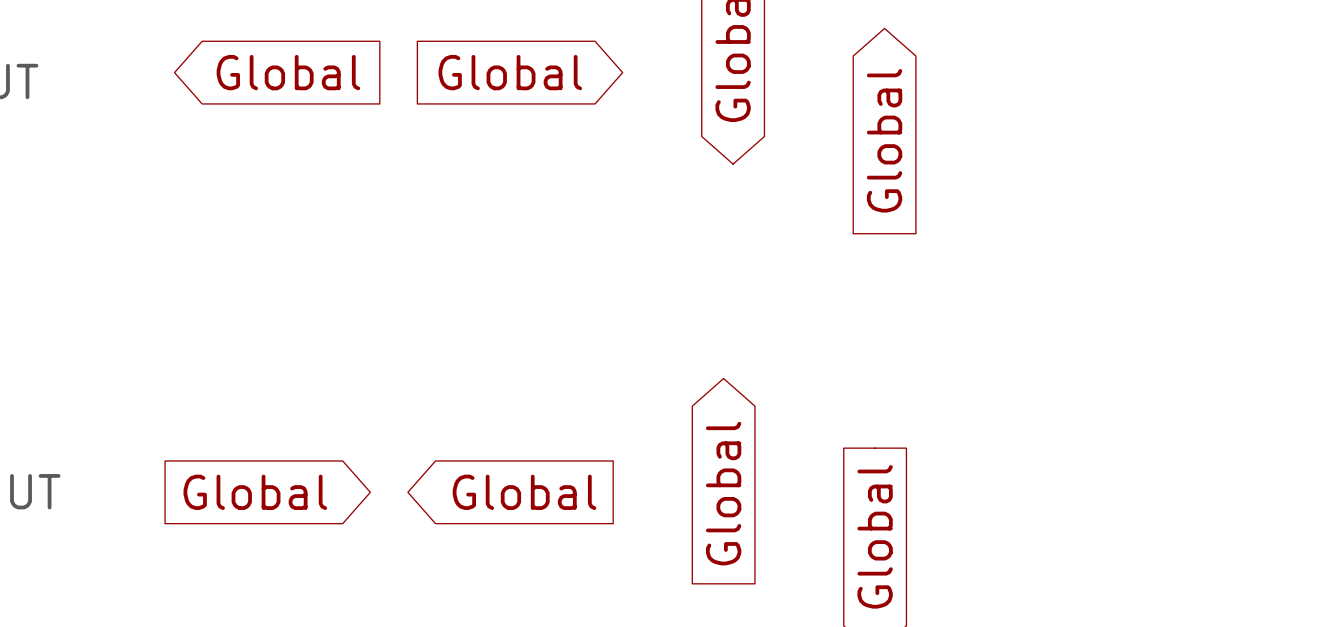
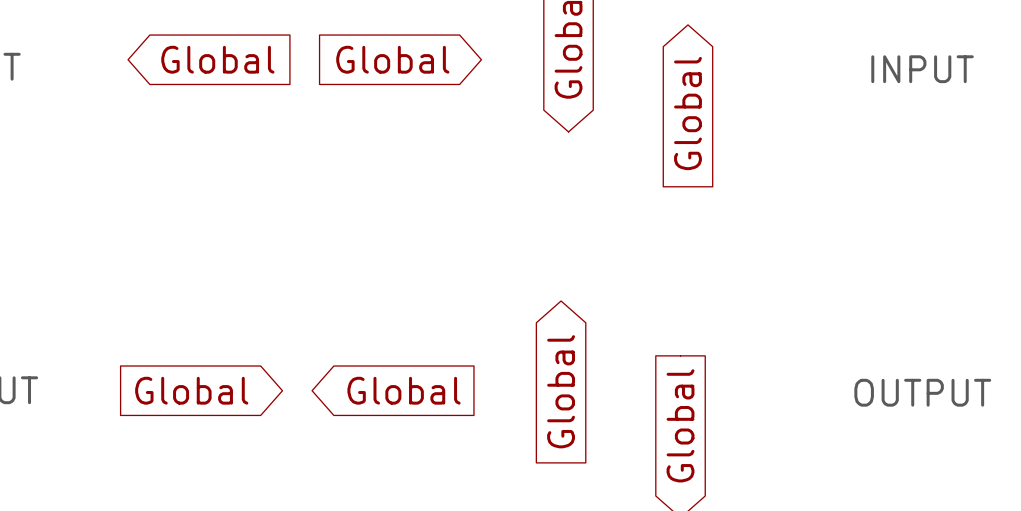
text: none -> INPUT (922, 69)
text: none -> OUTPUT (922, 392)

